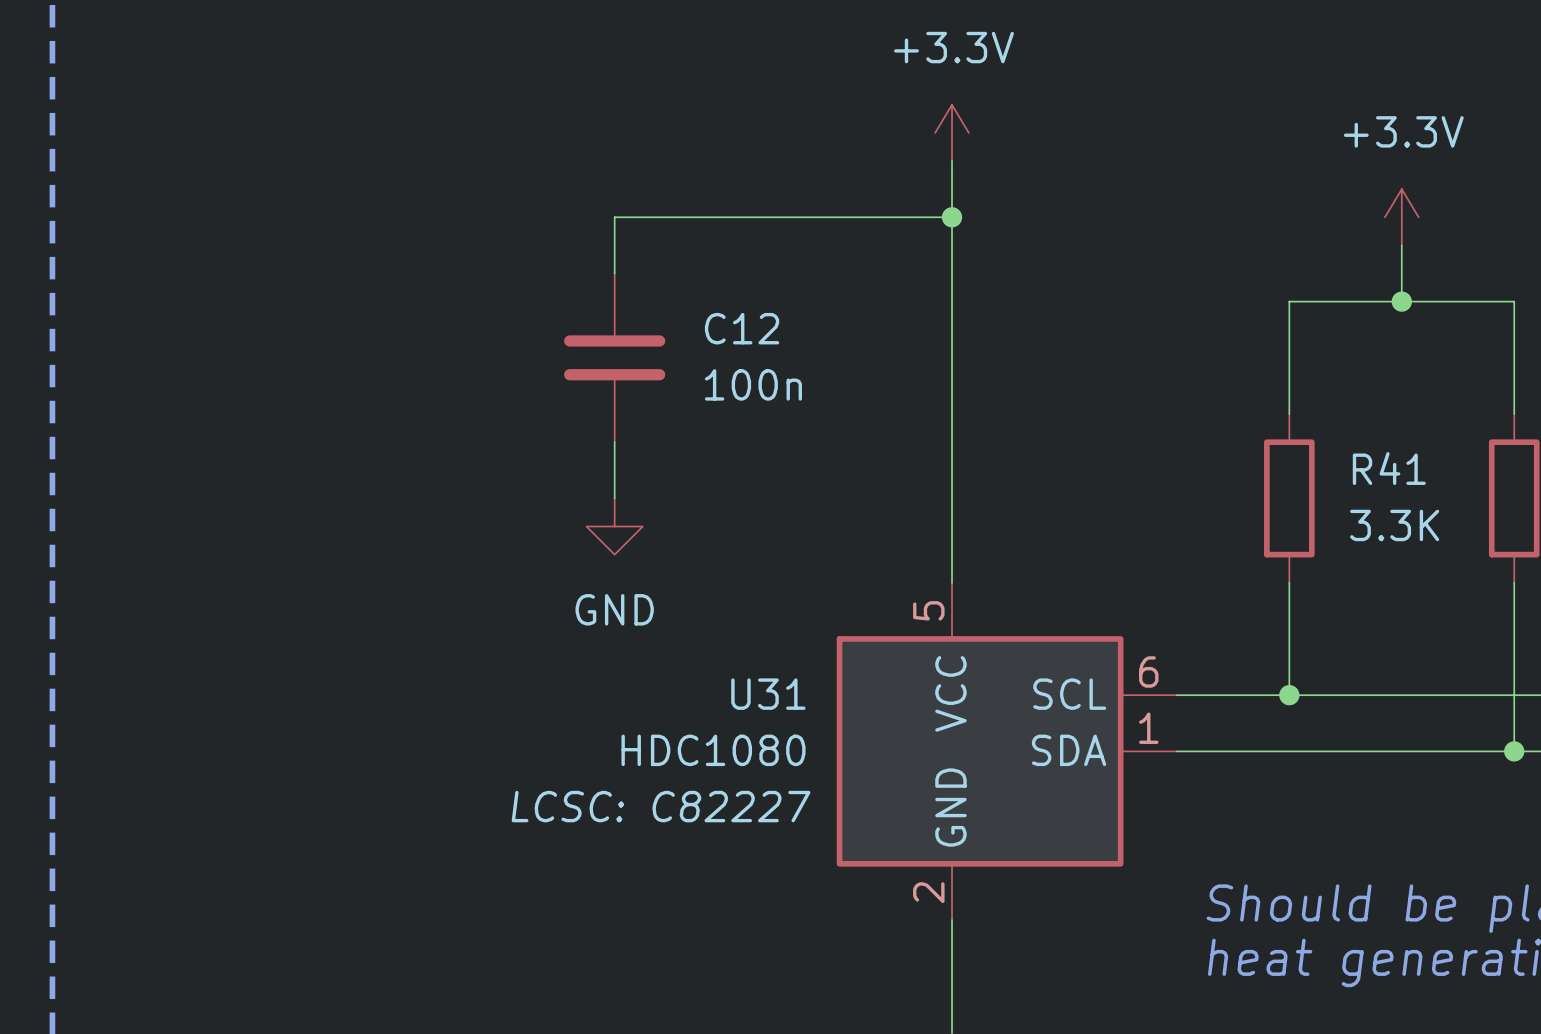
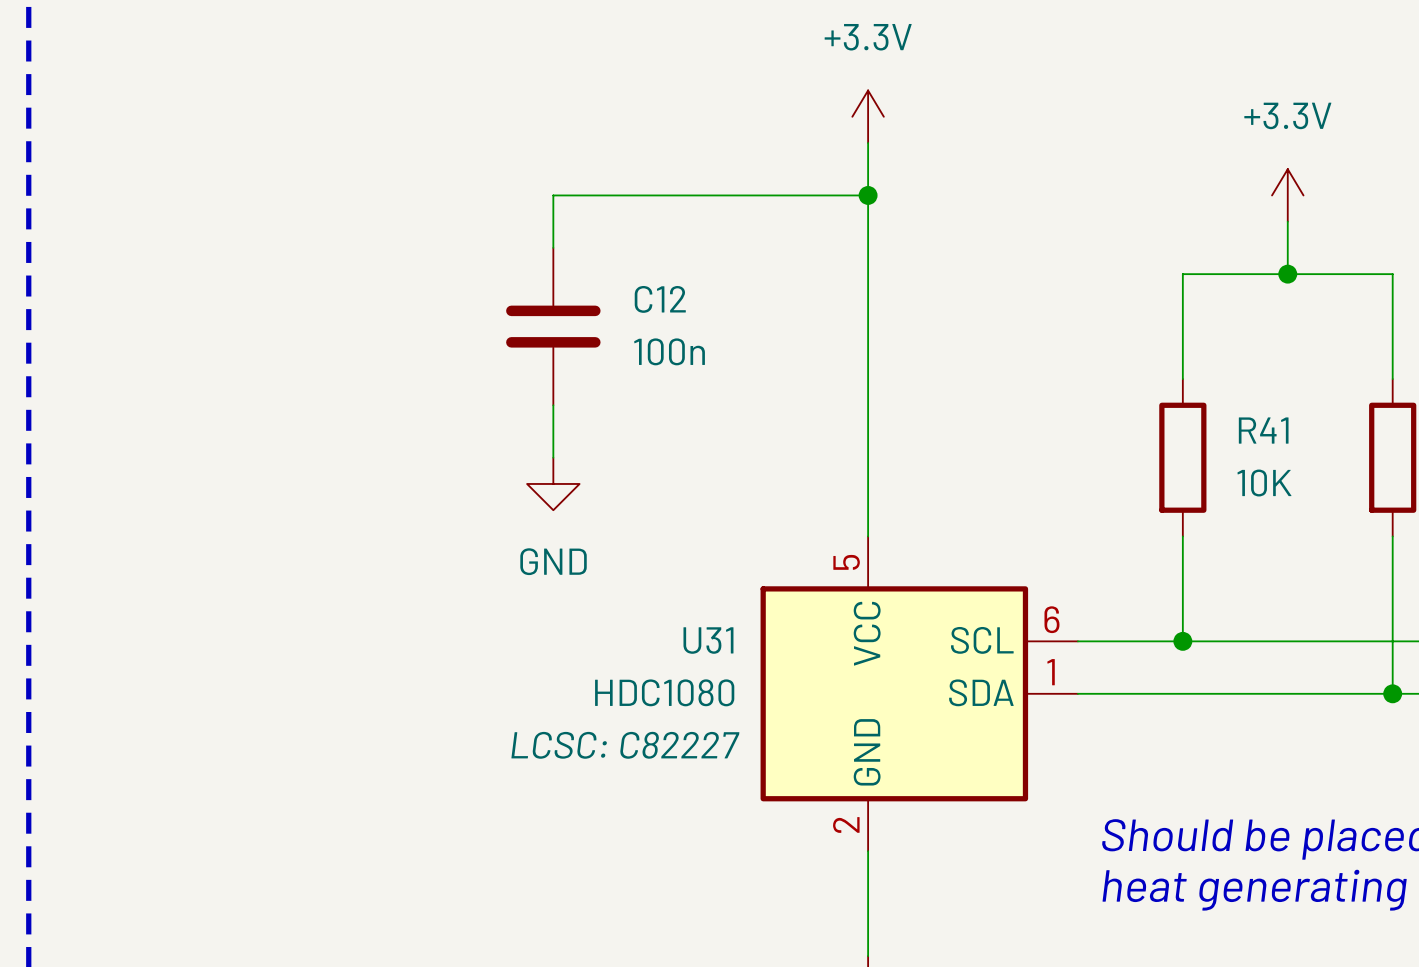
R41 value: 3.3K (1394, 525) -> 10K (1264, 483)

